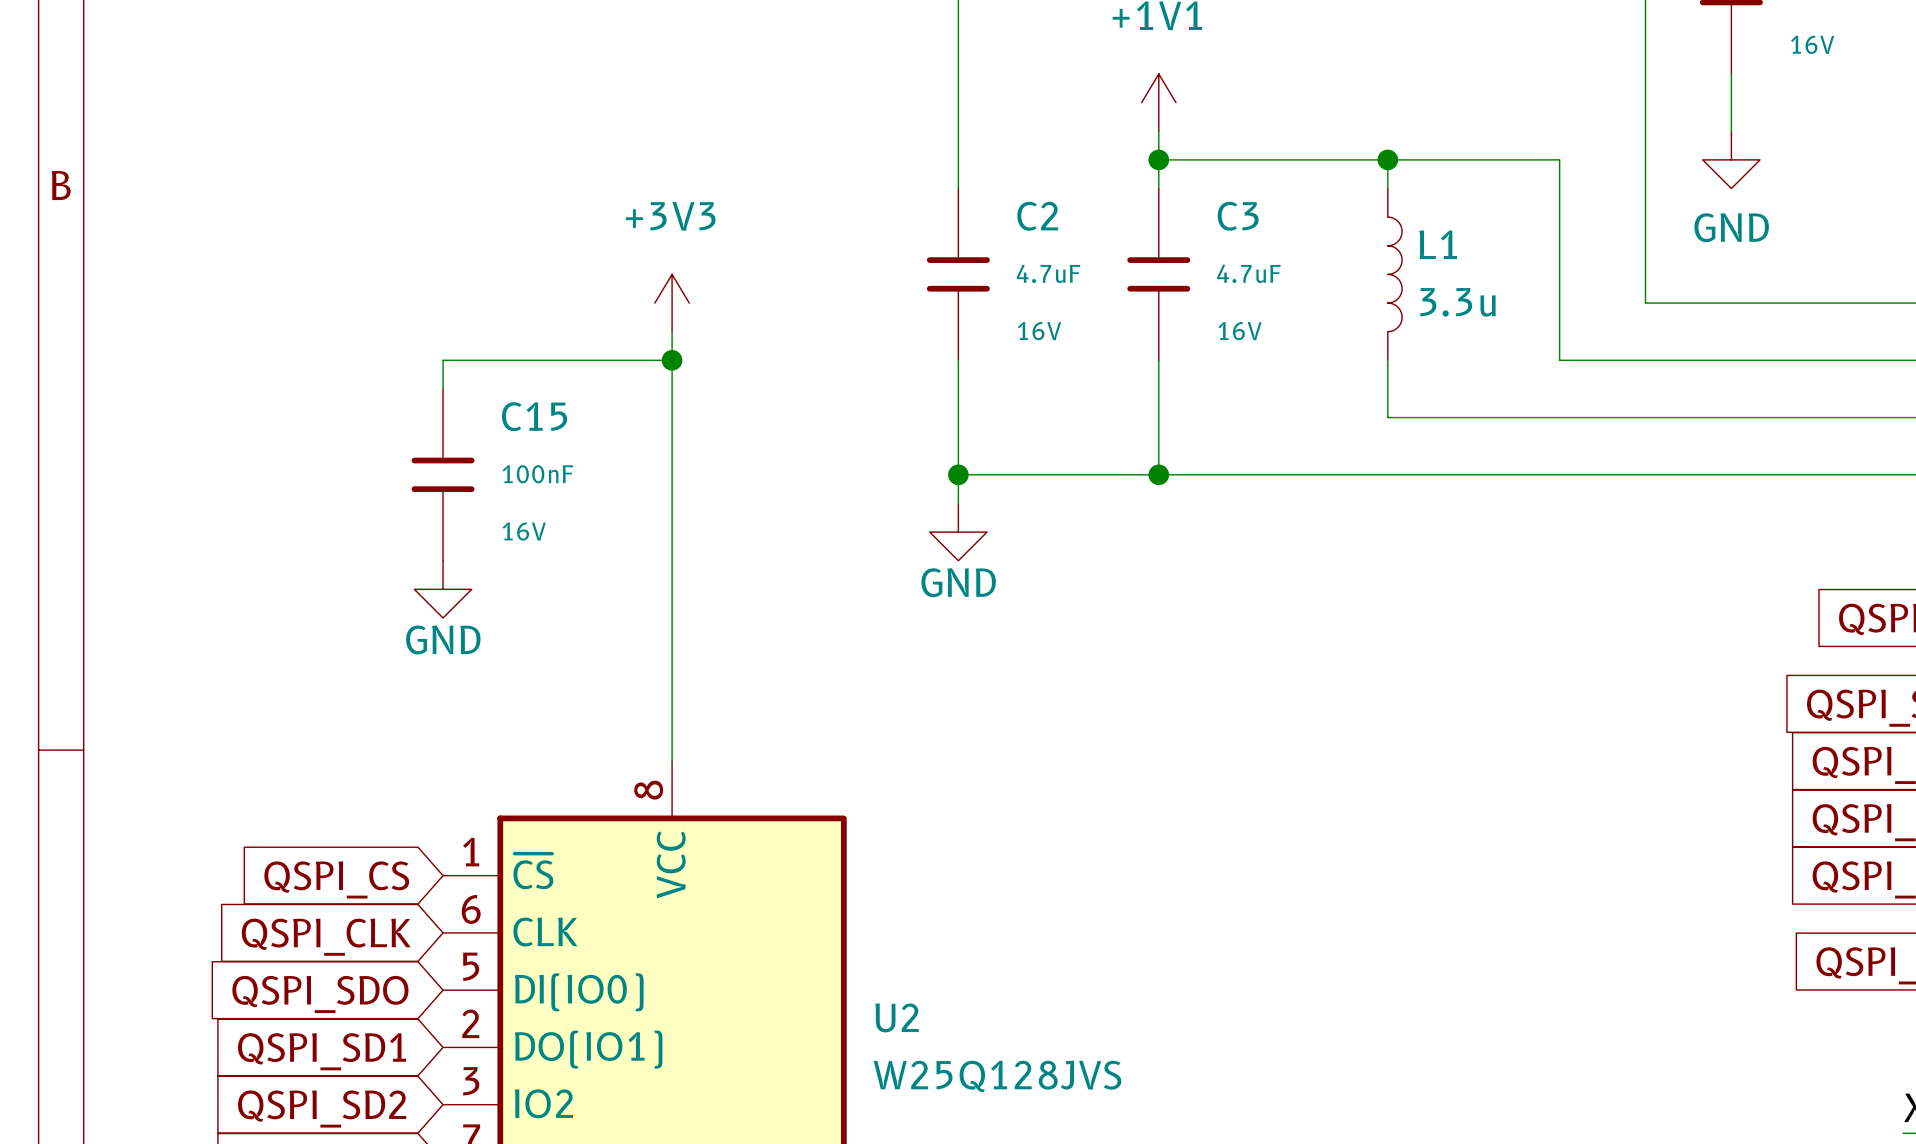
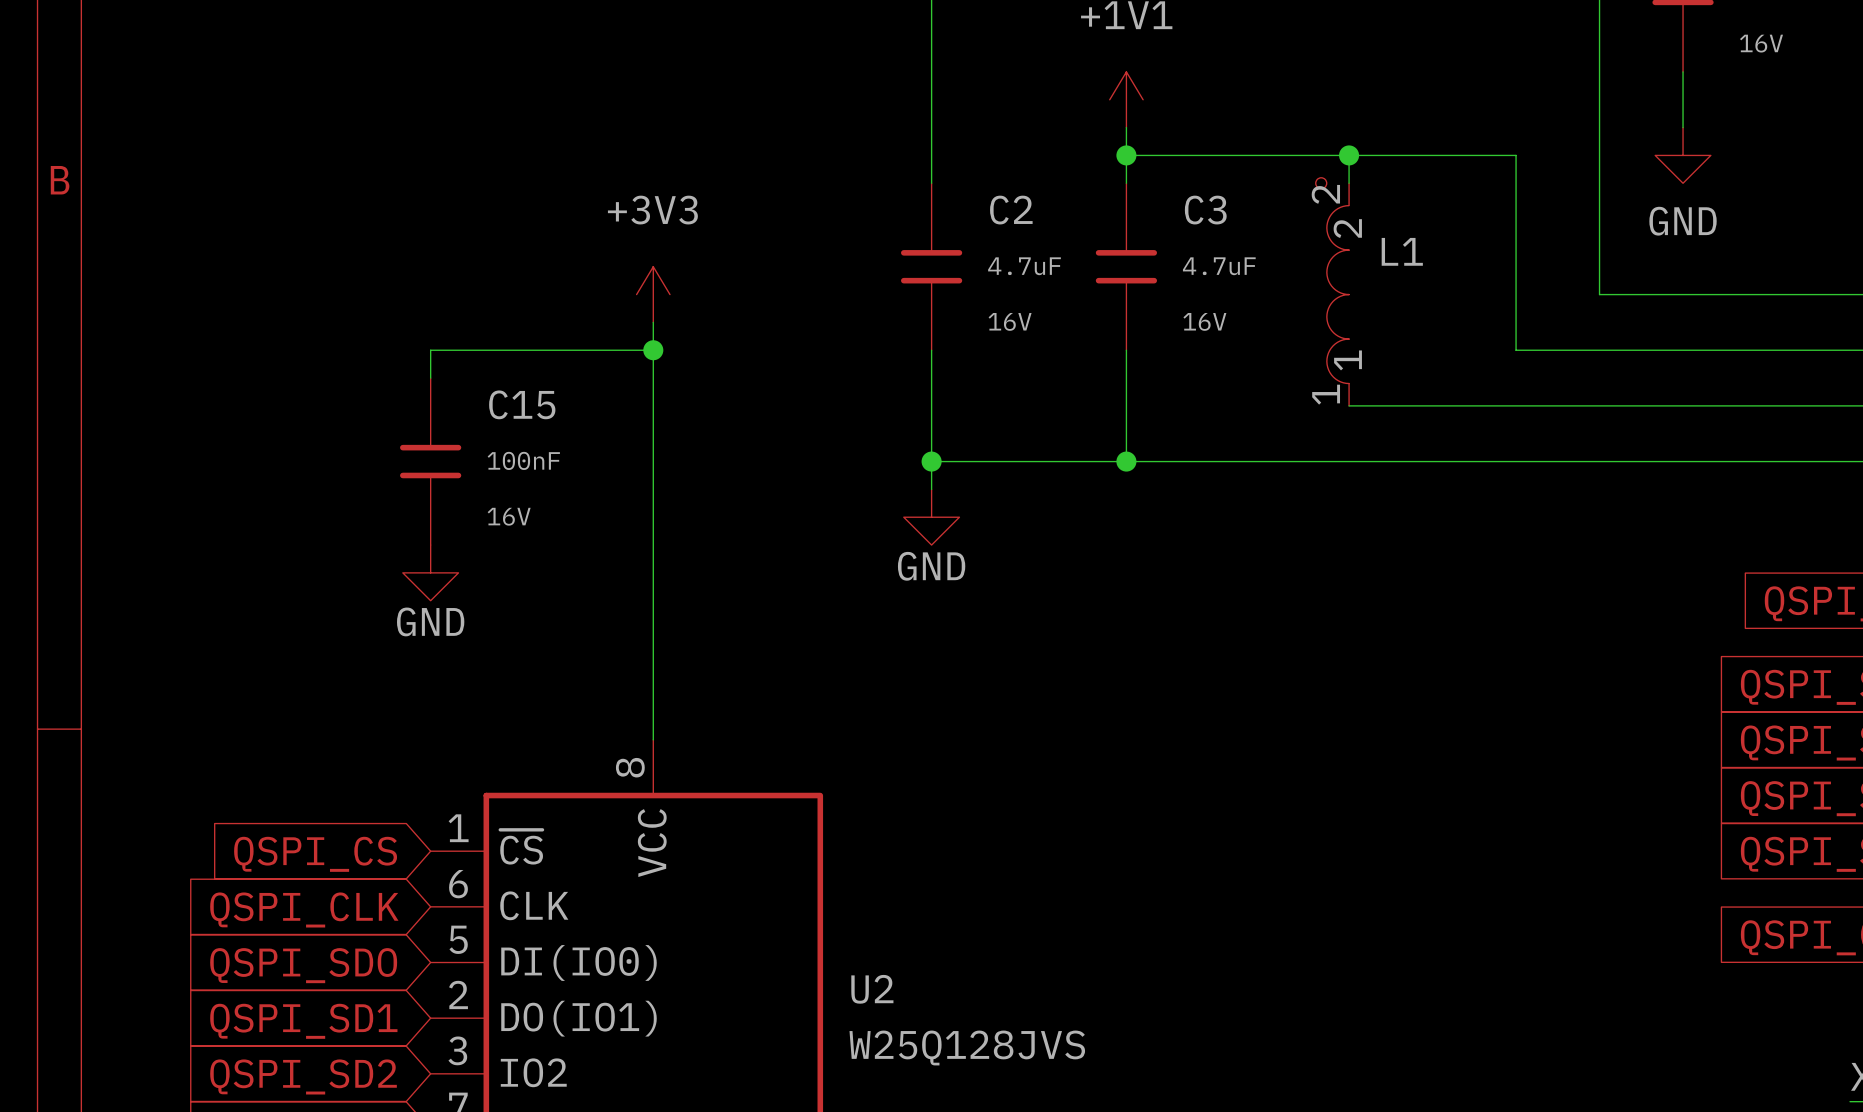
L1 symbol: [1387, 188, 1403, 361] -> [1315, 177, 1350, 406]
L1 value: 3.3u (1457, 302) -> none
wire: (1387, 360) (1387, 417) -> none

